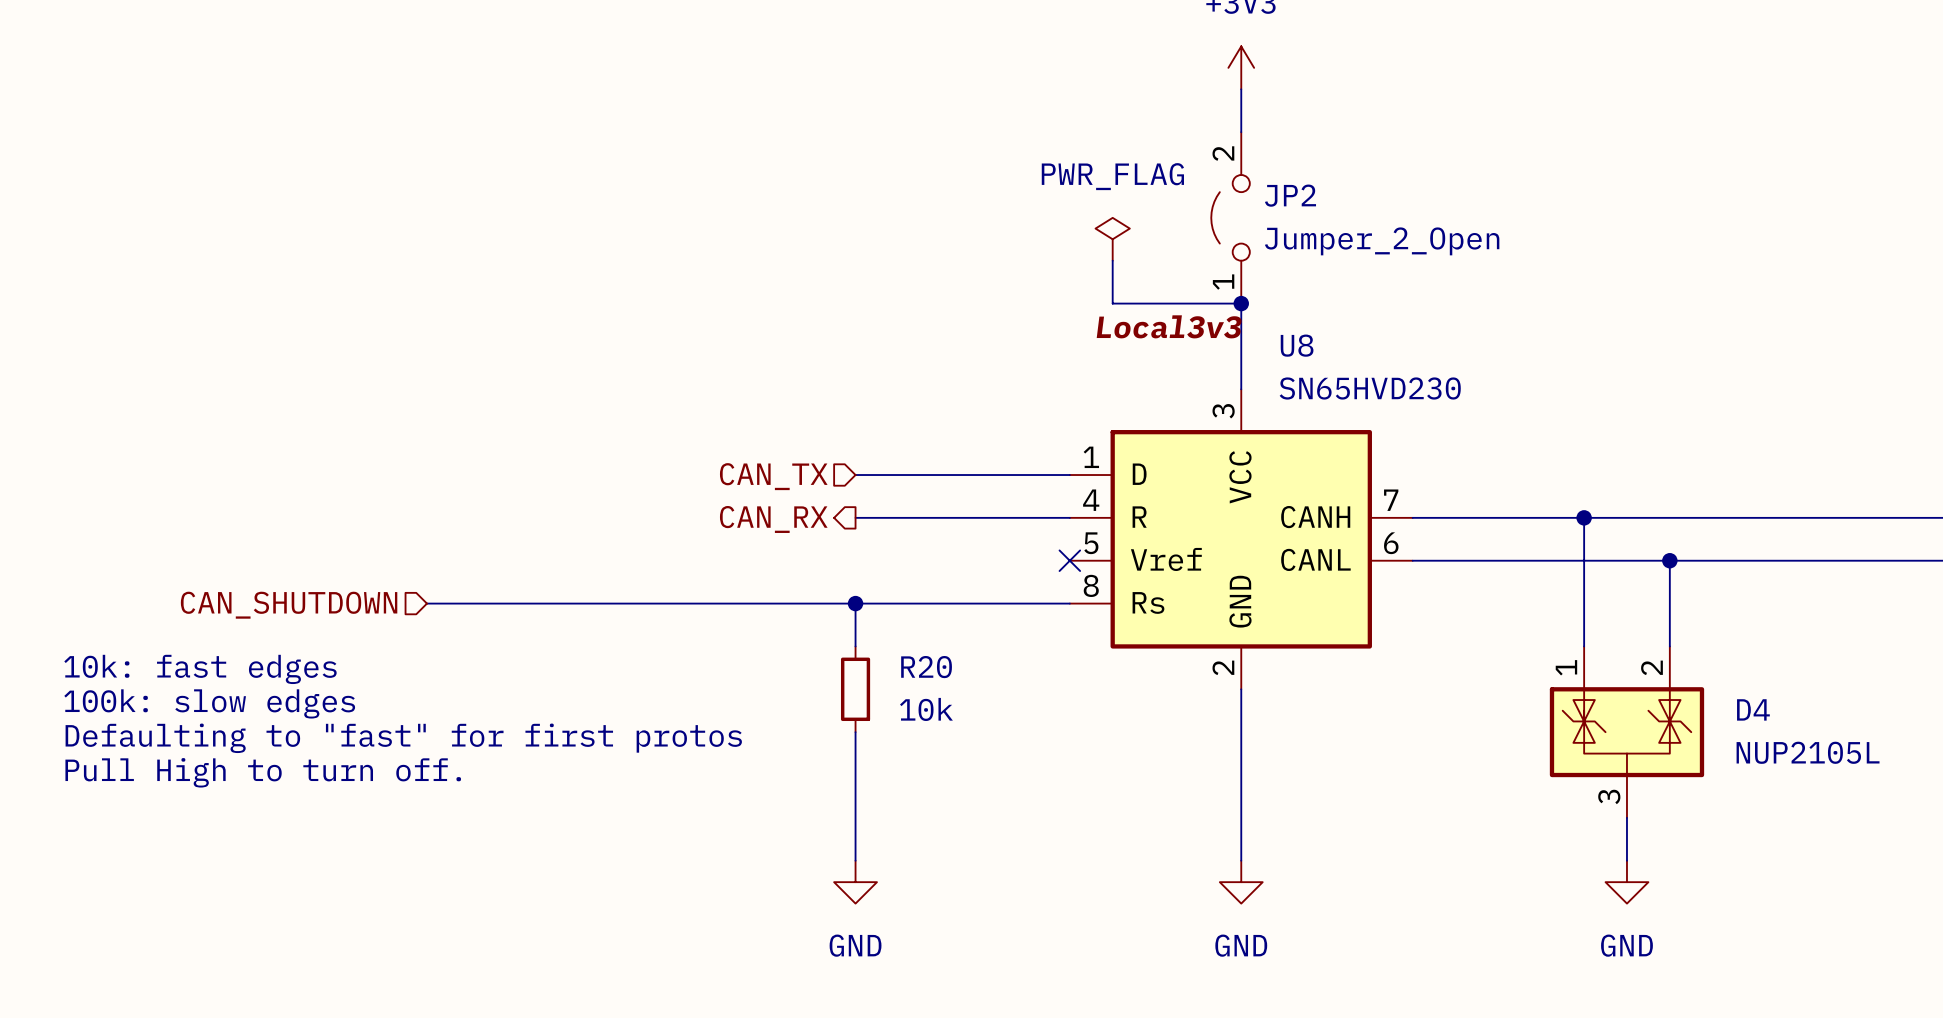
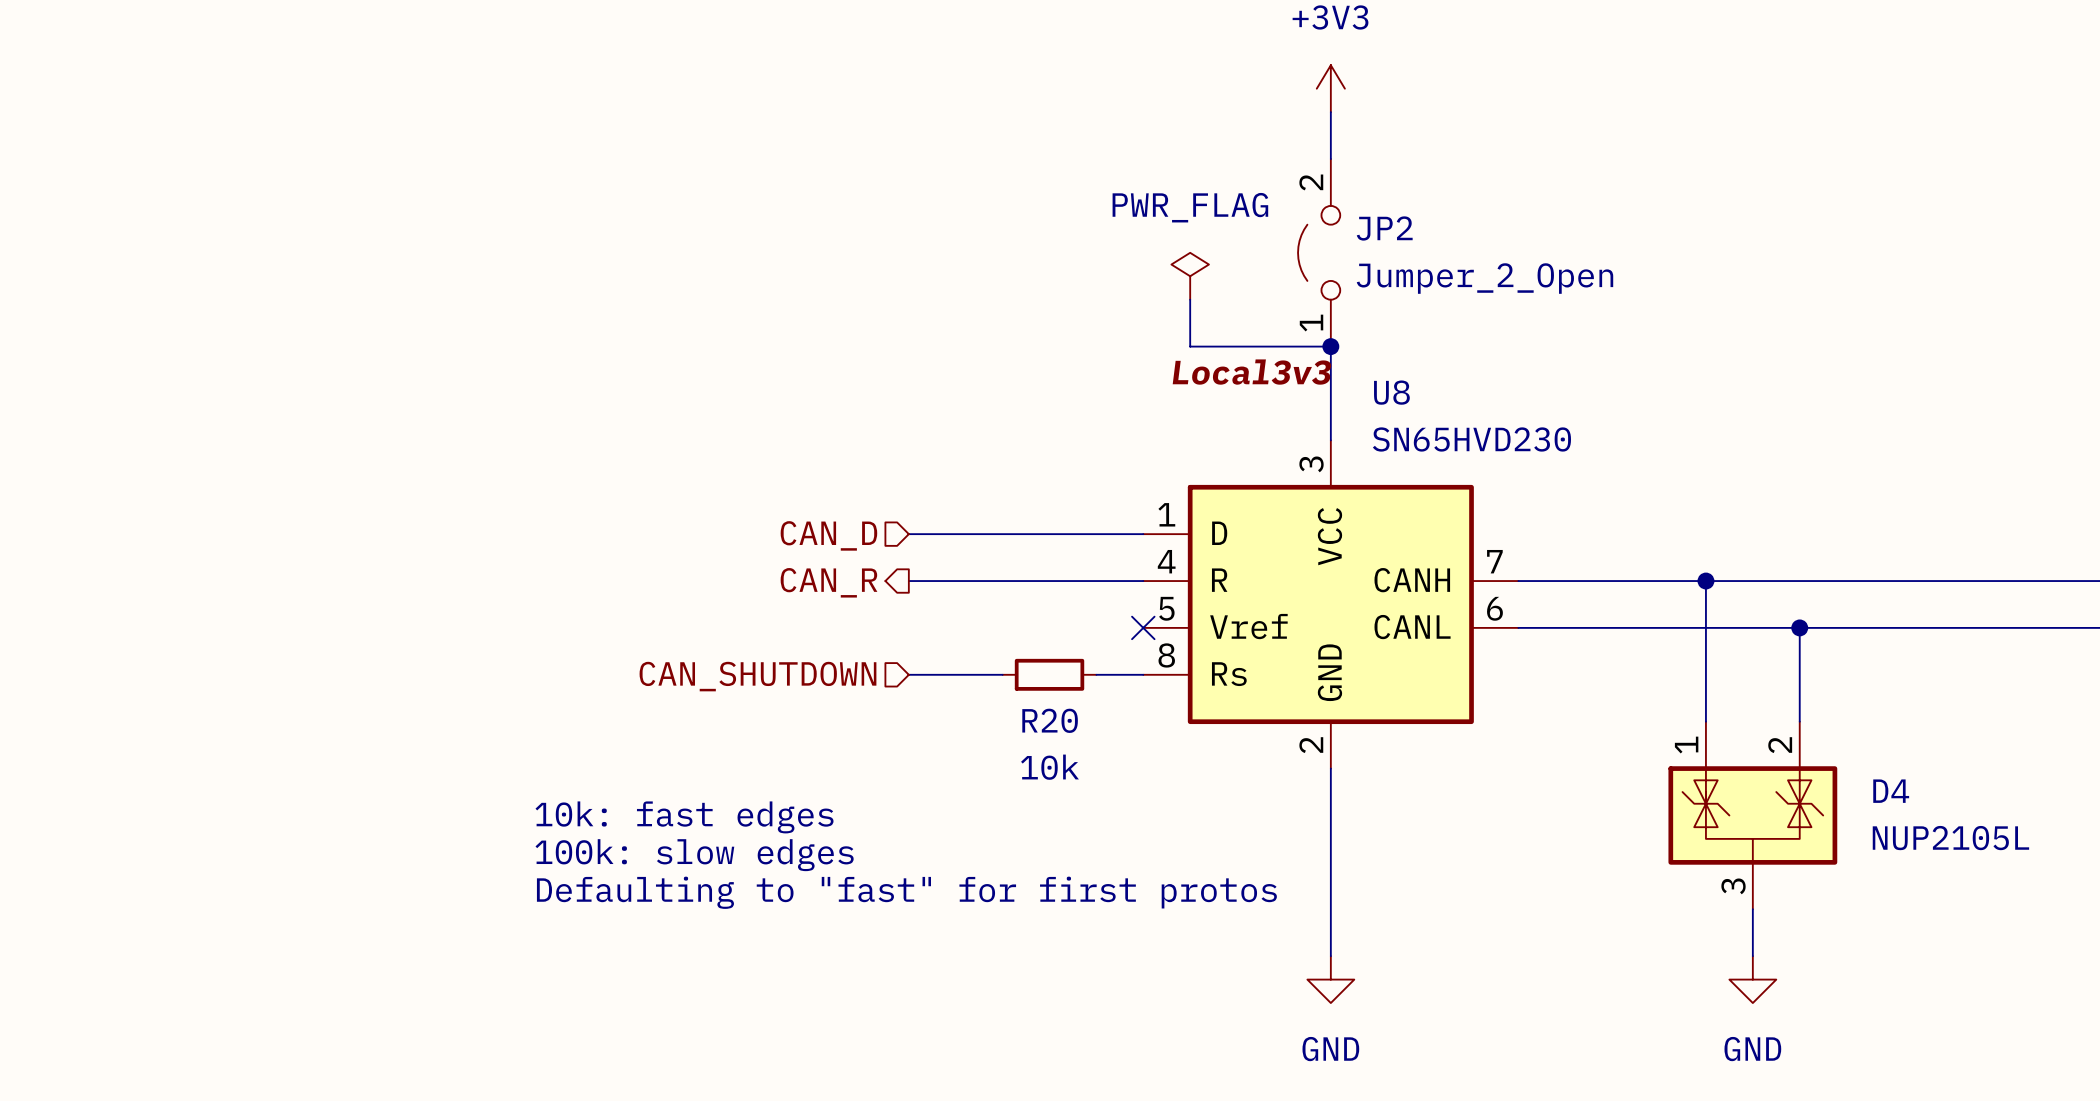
hierarchical label: CAN_TX (773, 476) -> CAN_D (828, 535)
hierarchical label: CAN_RX (773, 519) -> CAN_R (829, 582)
wire: (426, 603) (855, 603) (855, 646) -> none
junction: (855, 603) -> none
wire: (941, 603) (1026, 603) -> none
hierarchical label: CAN_SHUTDOWN (289, 605) -> none
hierarchical label: none -> CAN_SHUTDOWN (757, 676)
R20 name position: R20 (926, 667) -> R20 (1050, 720)
text: 10k: fast edges (200, 669) -> none
R20 rotation: 0° (855, 689) -> 90° clockwise (1049, 674)
R20 position: (855, 689) -> (1049, 674)
text: 100k: slow edges (209, 703) -> none
wire: (855, 732) (855, 860) -> none
text: none -> 10k: fast edges (684, 817)
text: Defaulting to "fast" for first protos (403, 738) -> none
text: none -> 100k: slow edges (694, 855)
text: Pull High to turn off. (263, 772) -> none
text: none -> Defaulting to "fast" for first protos (906, 892)
power symbol: GND (855, 882) -> none

